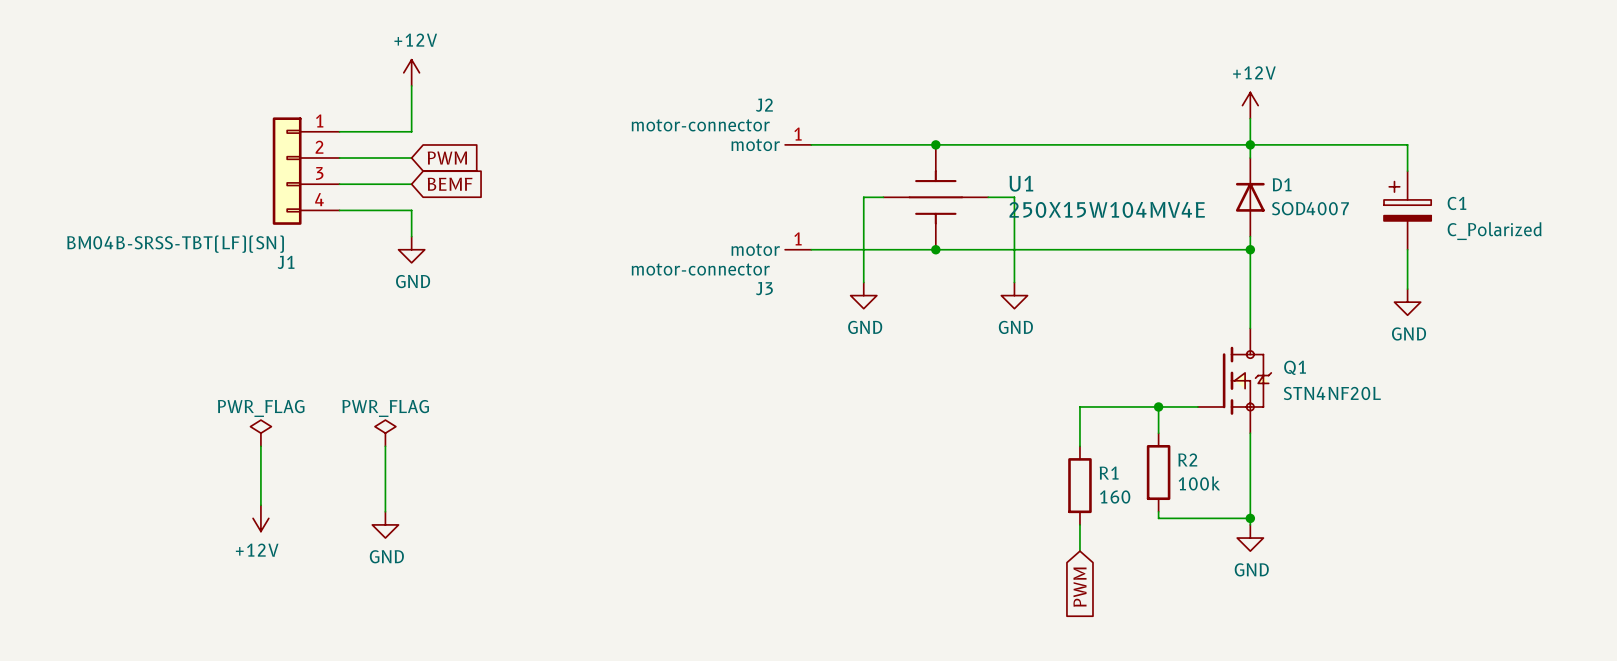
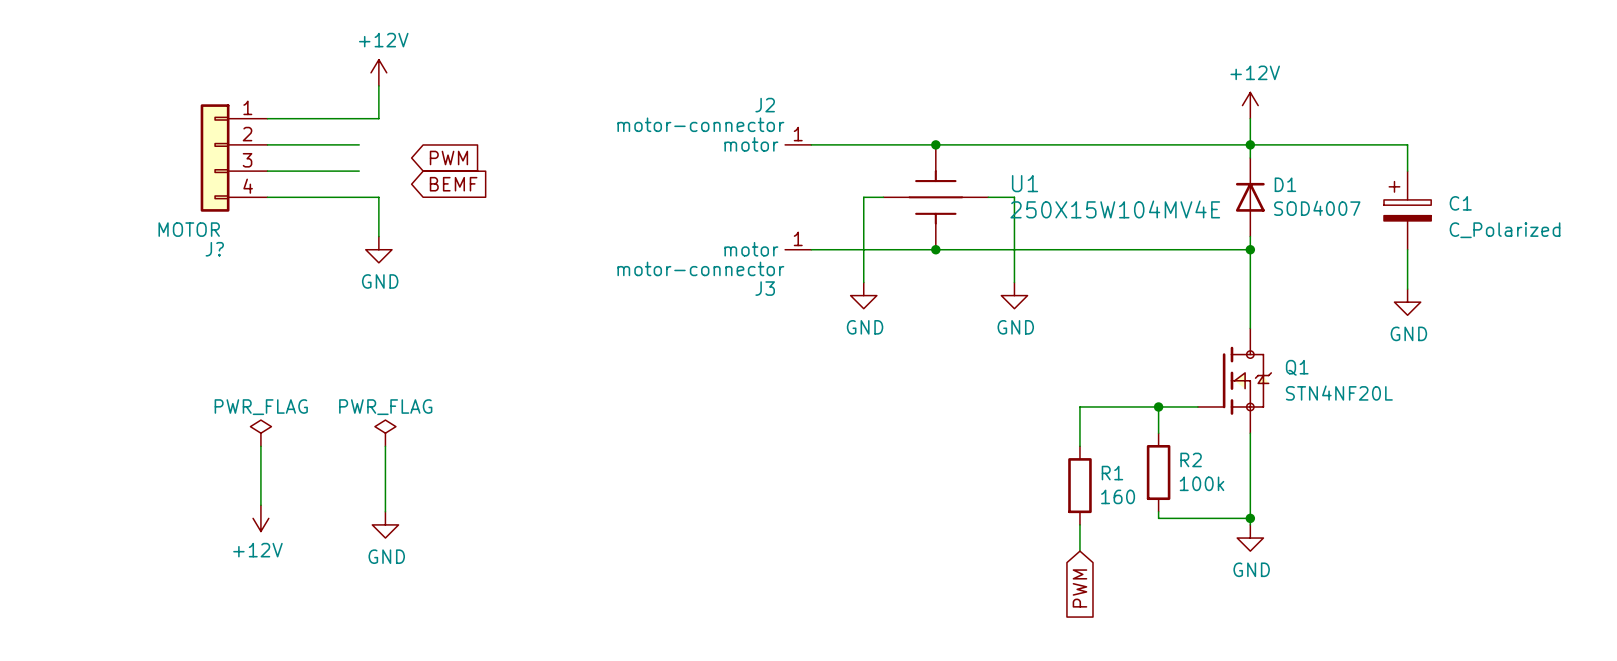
power symbol position: +12V (411, 72) -> +12V (378, 72)
wire: none -> (378, 85) (378, 118) (267, 118)
wire: (411, 85) (411, 131) (339, 131) -> none
wire: none -> (267, 144) (359, 144)
J?: none -> MOTOR (234, 158)
wire: (339, 158) (411, 158) -> none
wire: none -> (267, 171) (359, 171)
J1: BM04B-SRSS-TBT(LF)(SN) (306, 171) -> none
wire: (339, 184) (411, 184) -> none
wire: none -> (267, 197) (378, 197) (378, 236)
wire: (339, 210) (411, 210) (411, 236) -> none
power symbol position: GND (411, 249) -> GND (378, 249)

